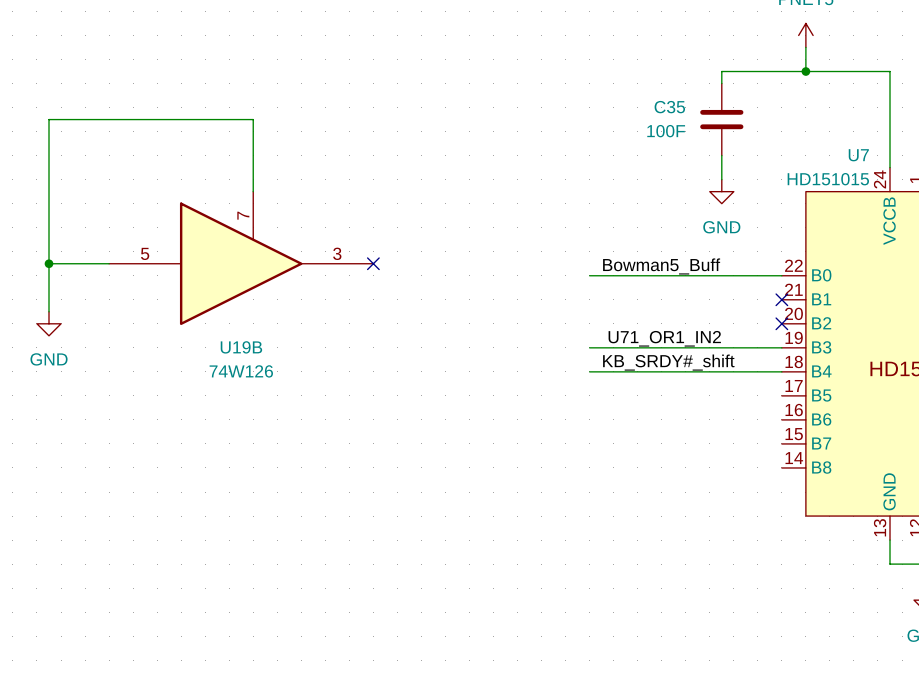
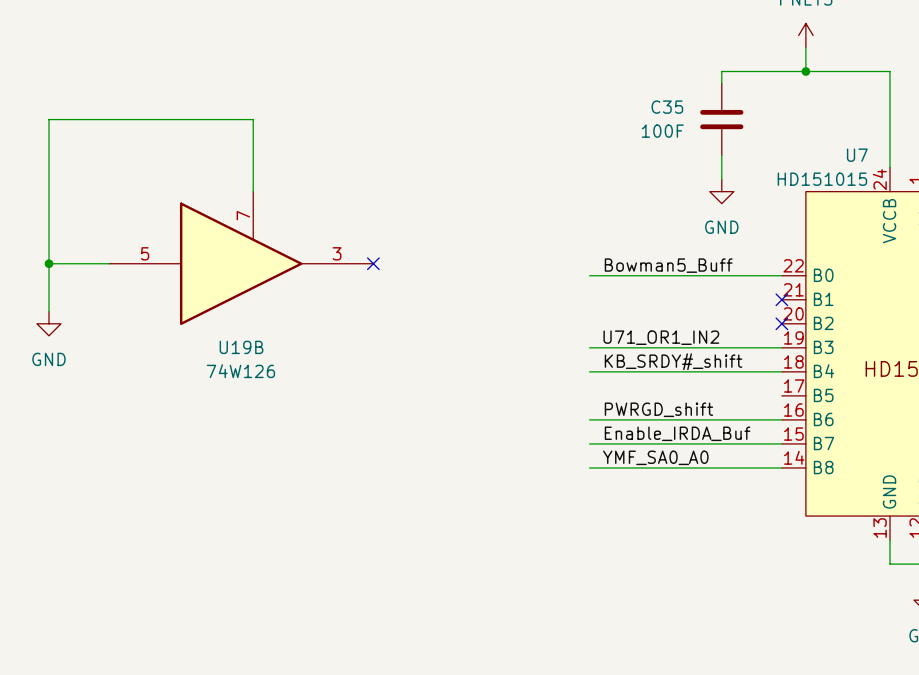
label: none -> PWRGD_shift (658, 409)
wire: none -> (589, 419) (781, 419)
label: none -> Enable_IRDA_Buf (677, 433)
wire: none -> (589, 443) (781, 443)
label: none -> YMF_SA0_A0 (655, 457)
wire: none -> (589, 467) (781, 467)

